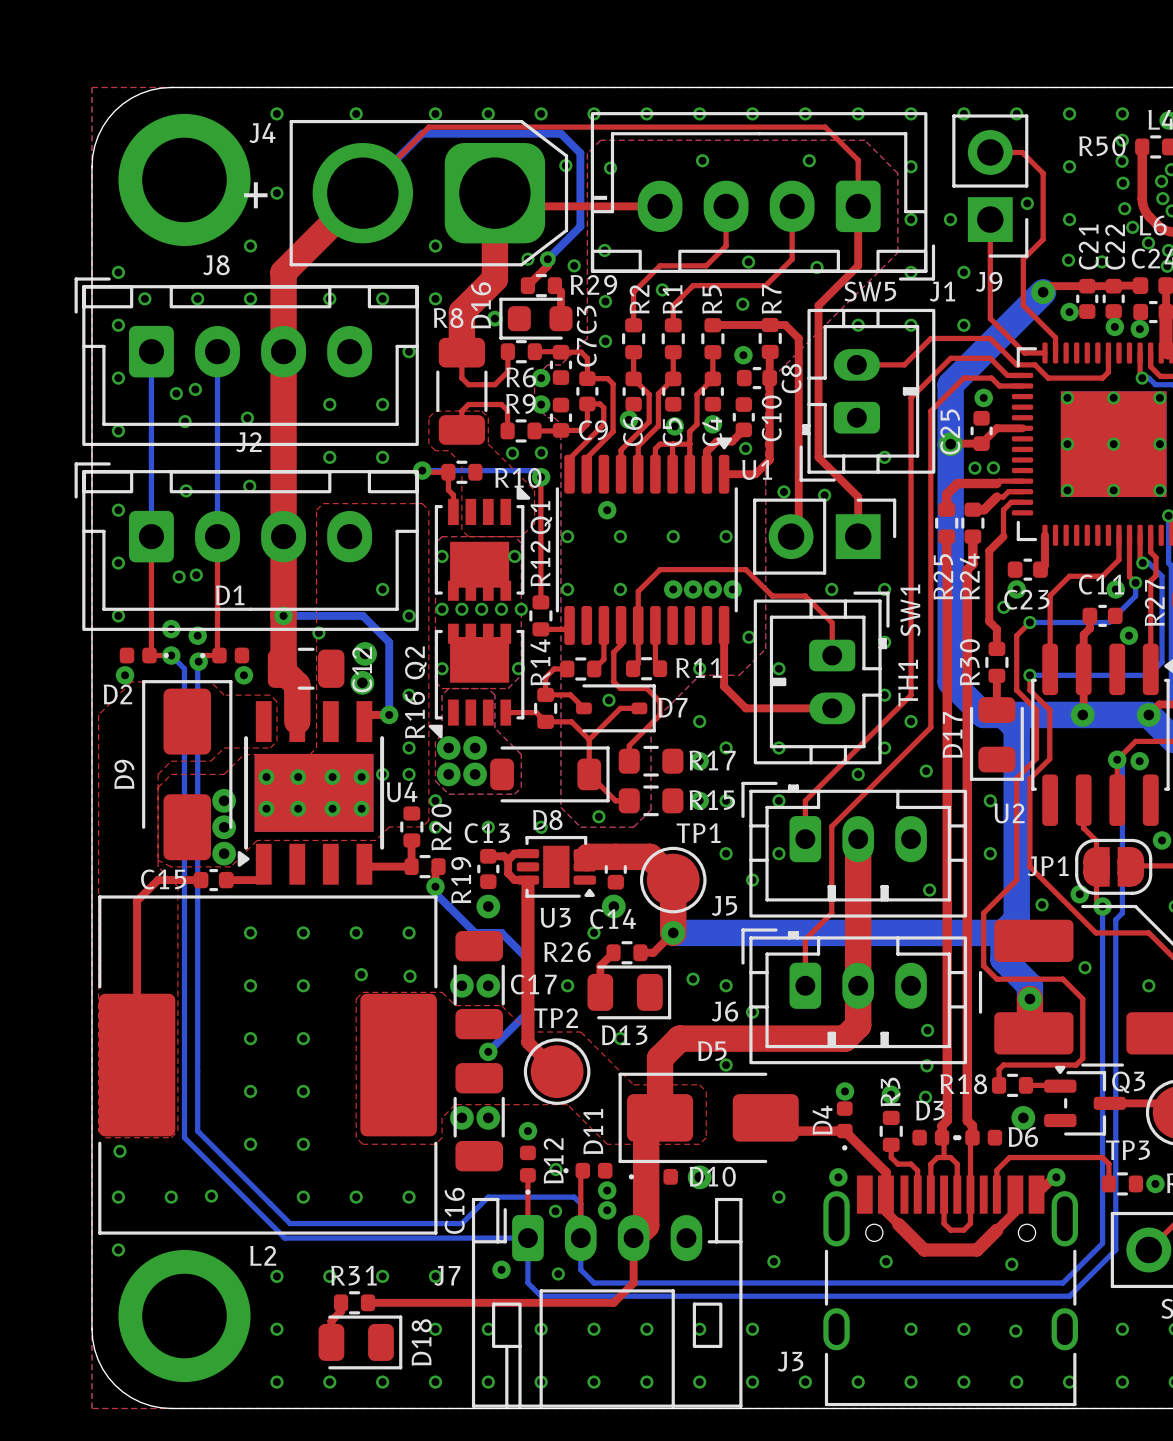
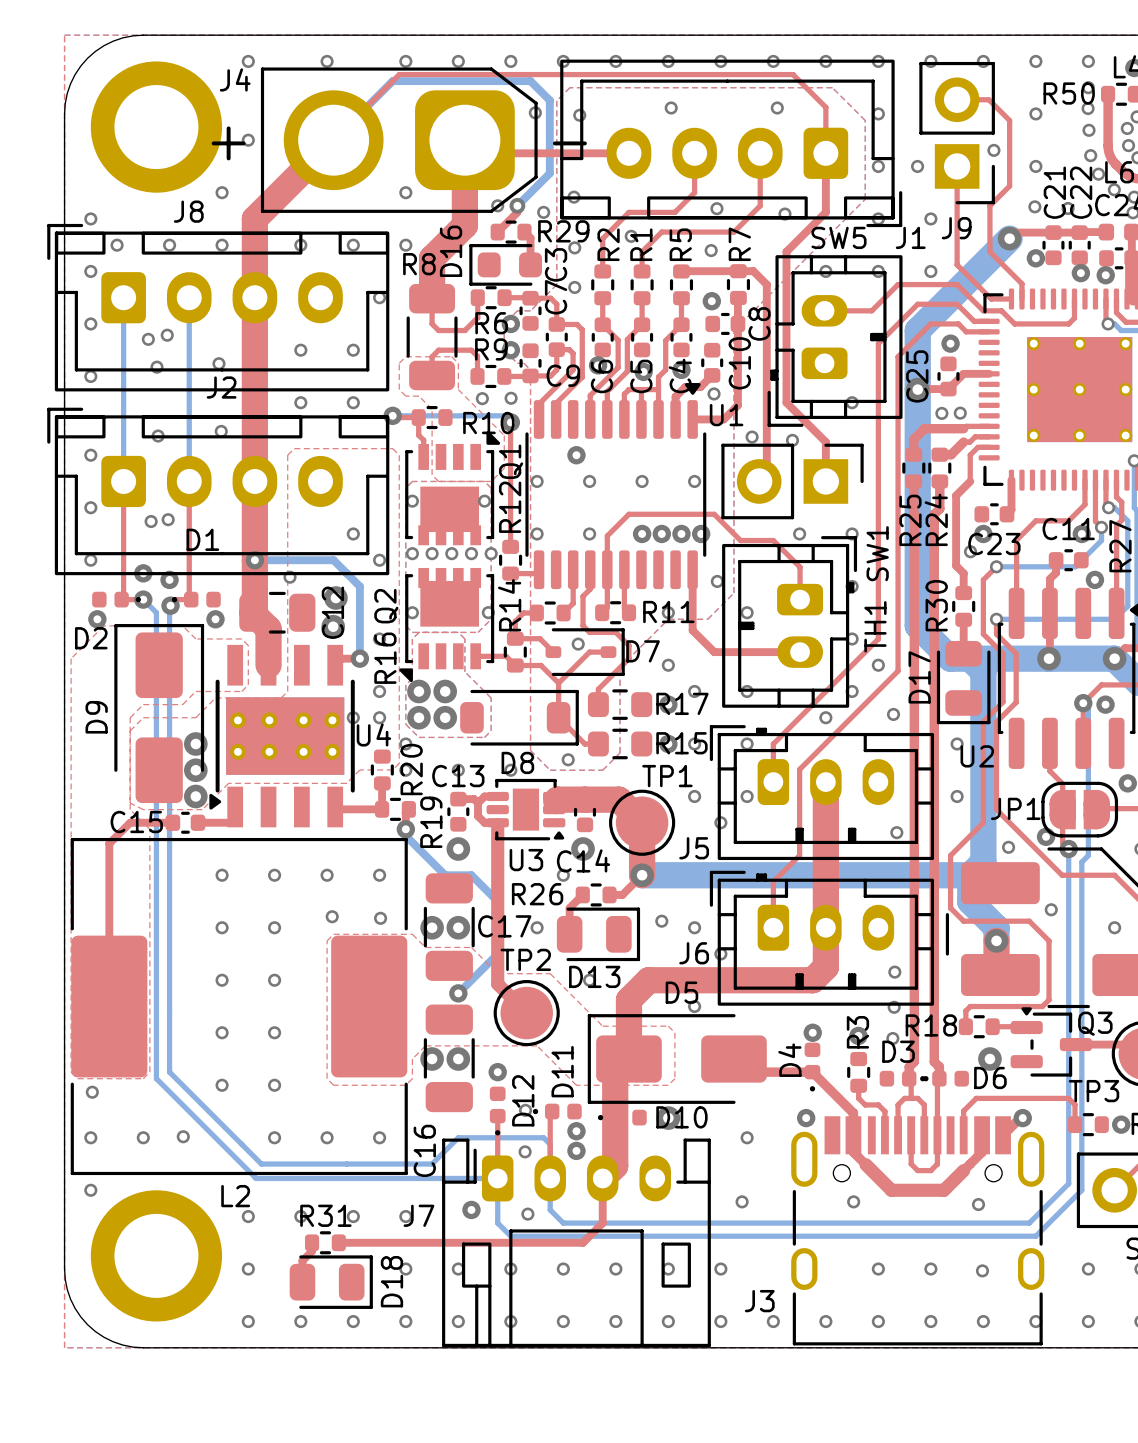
via: (494, 318) -> none

